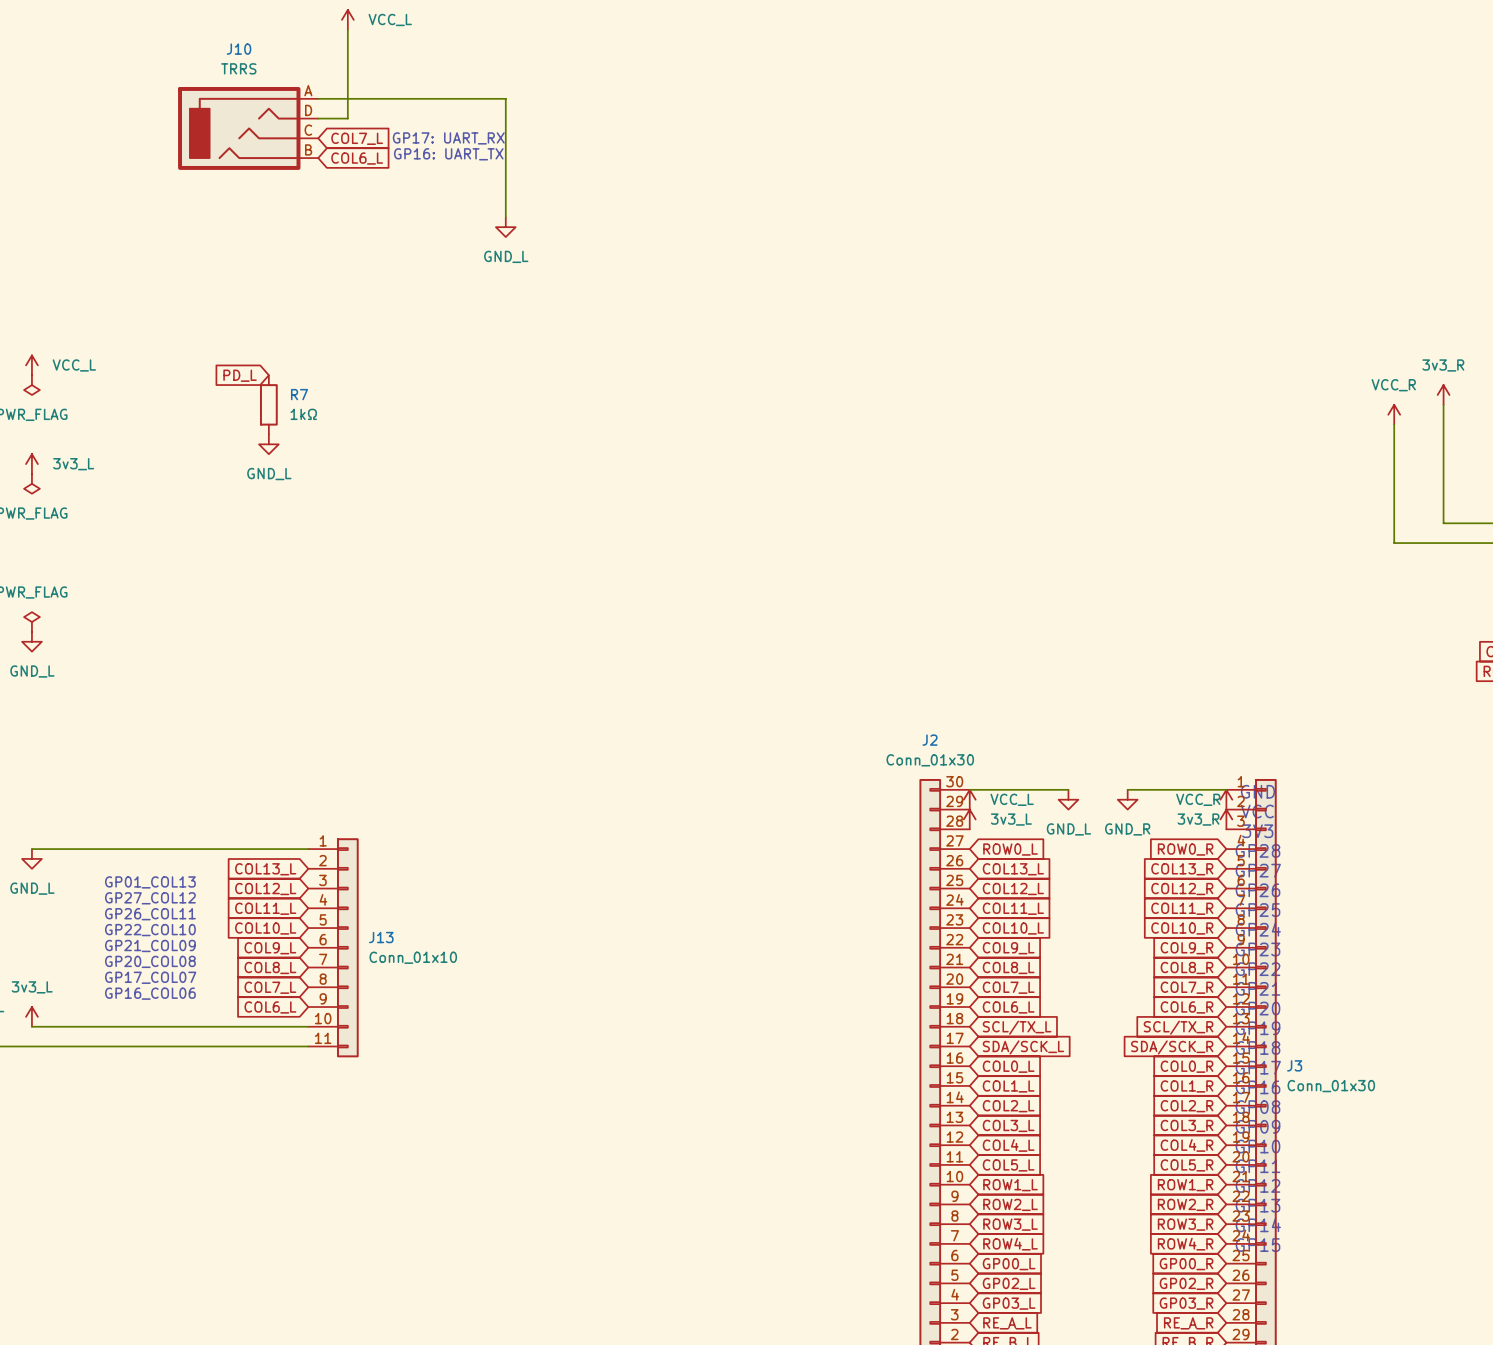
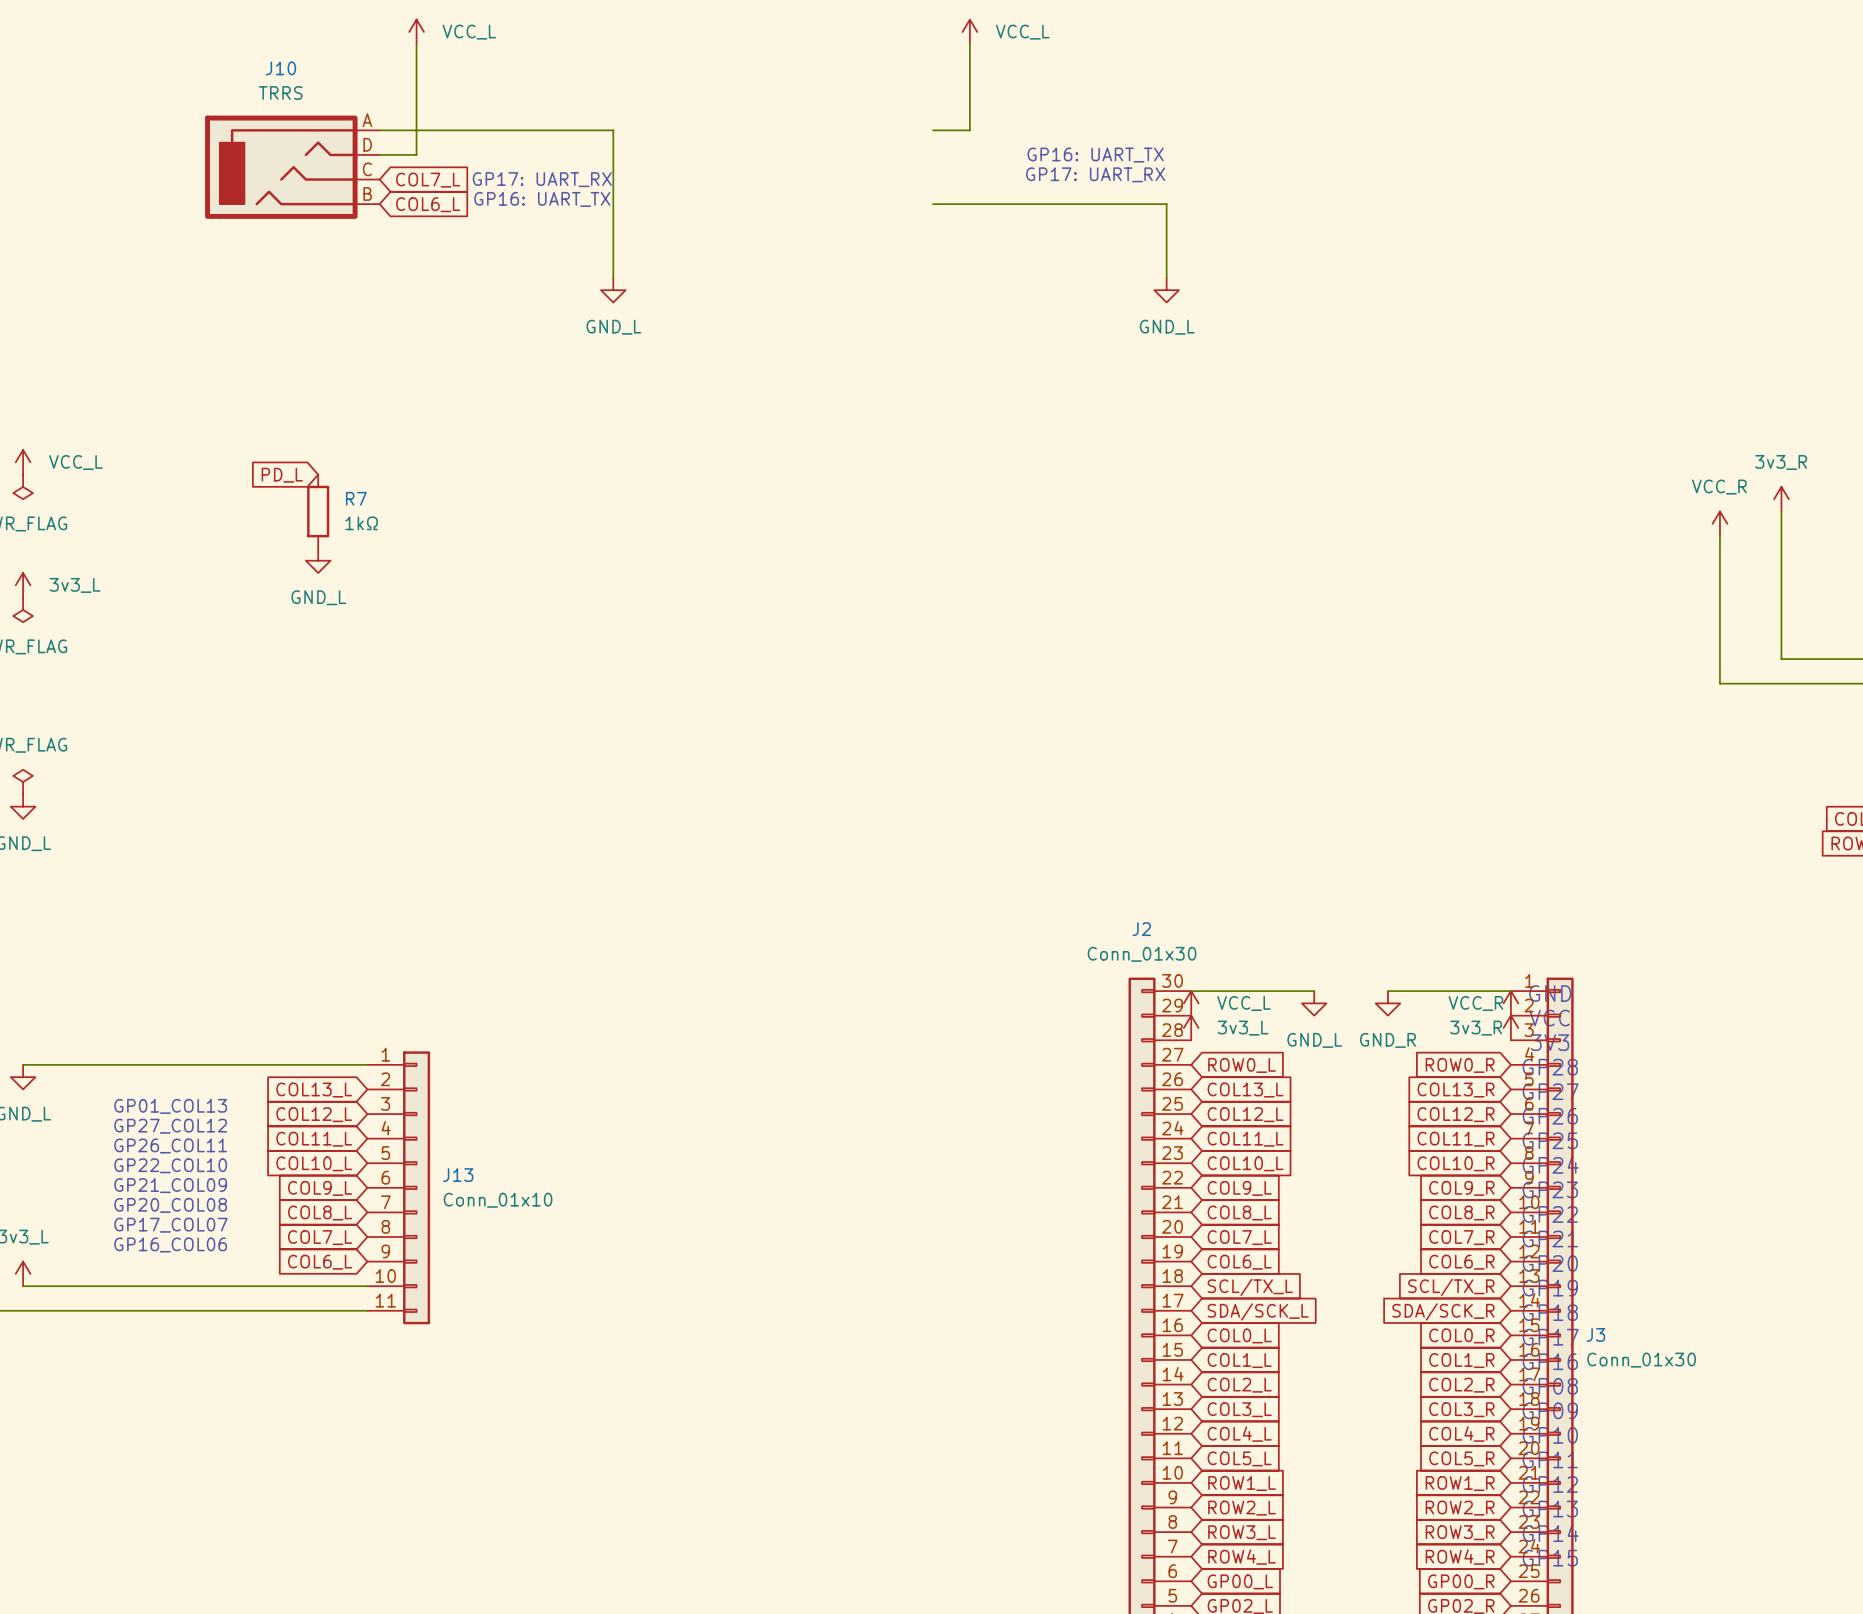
power symbol: none -> VCC_L (969, 31)
wire: none -> (969, 44) (969, 130) (933, 130)
text: none -> GP16: UART_TX (1095, 155)
text: none -> GP17: UART_RX (1095, 174)
wire: none -> (933, 204) (1166, 204) (1166, 277)
power symbol: none -> GND_L (1166, 290)

